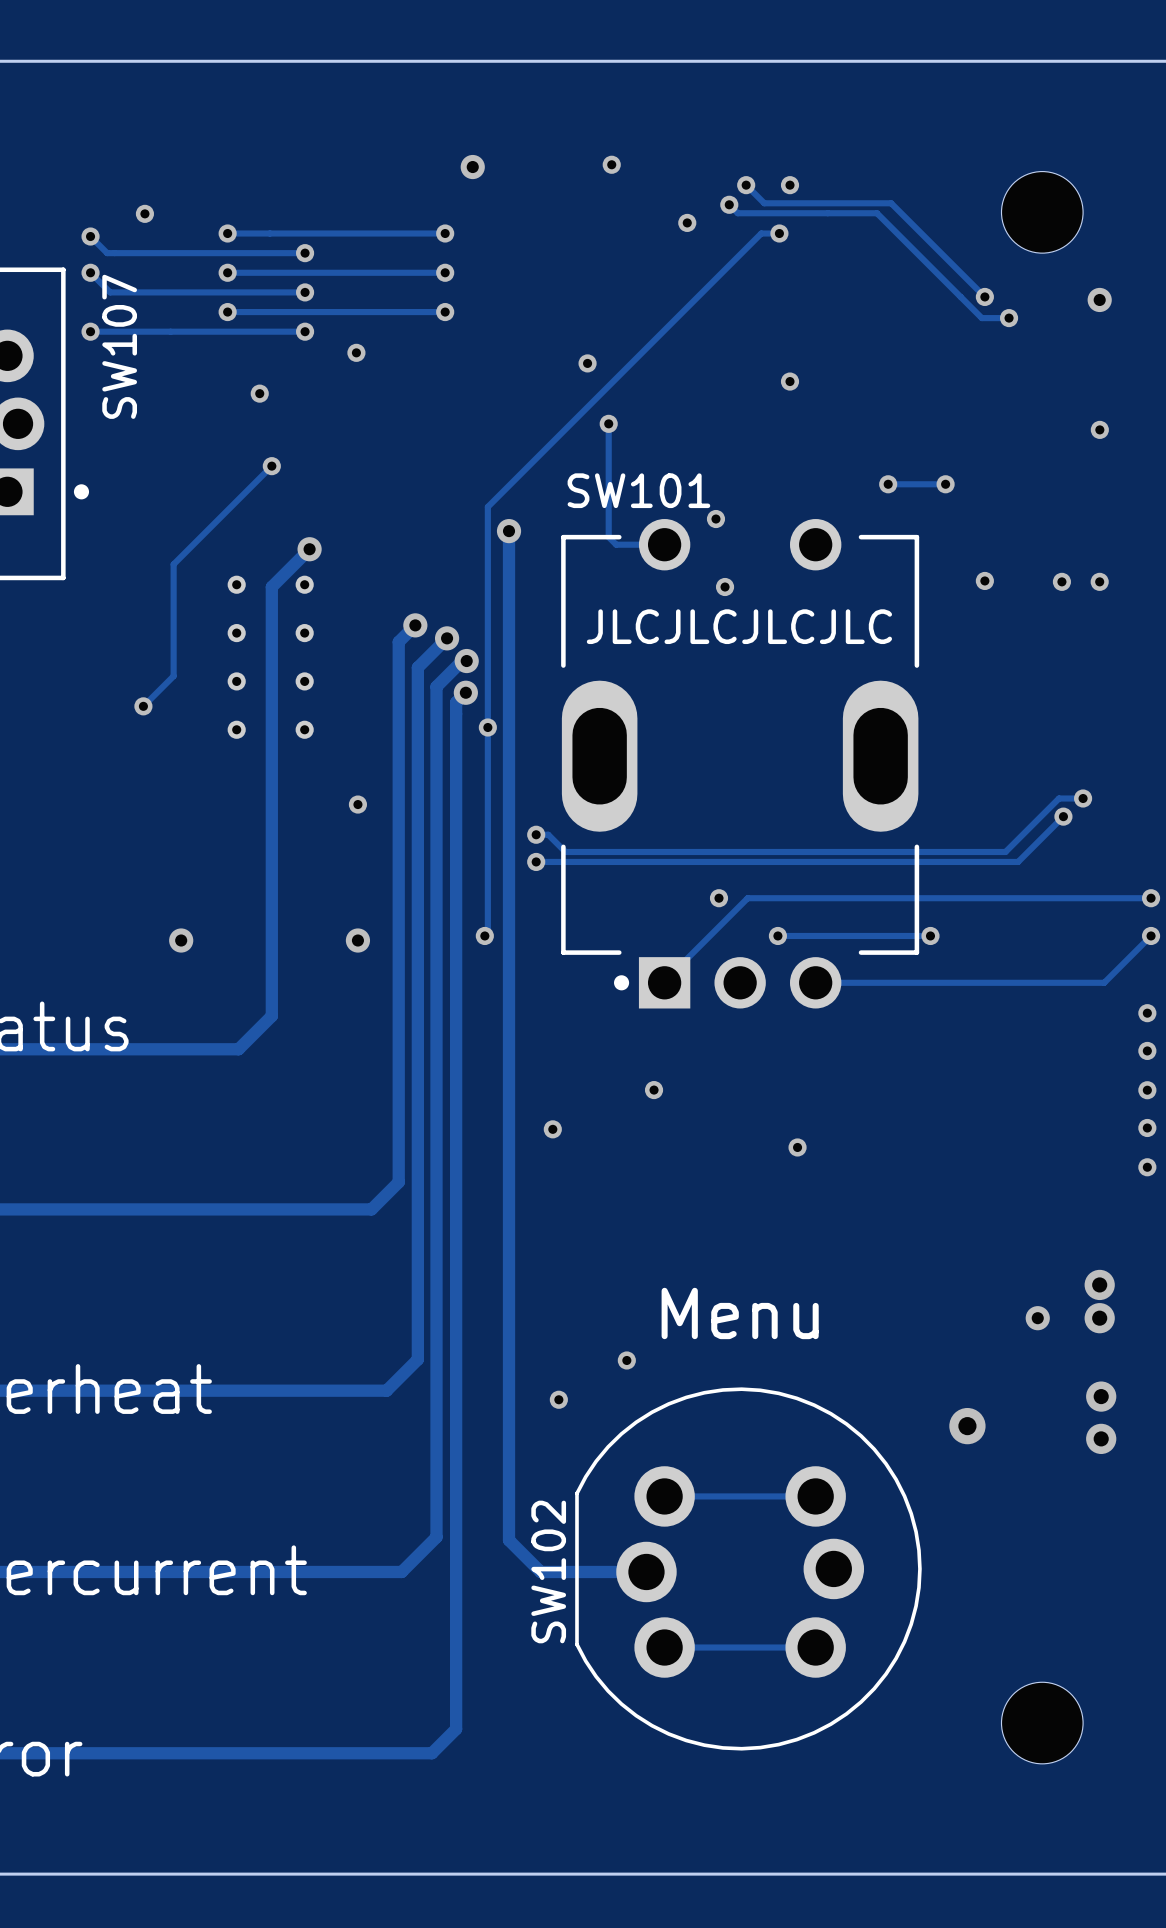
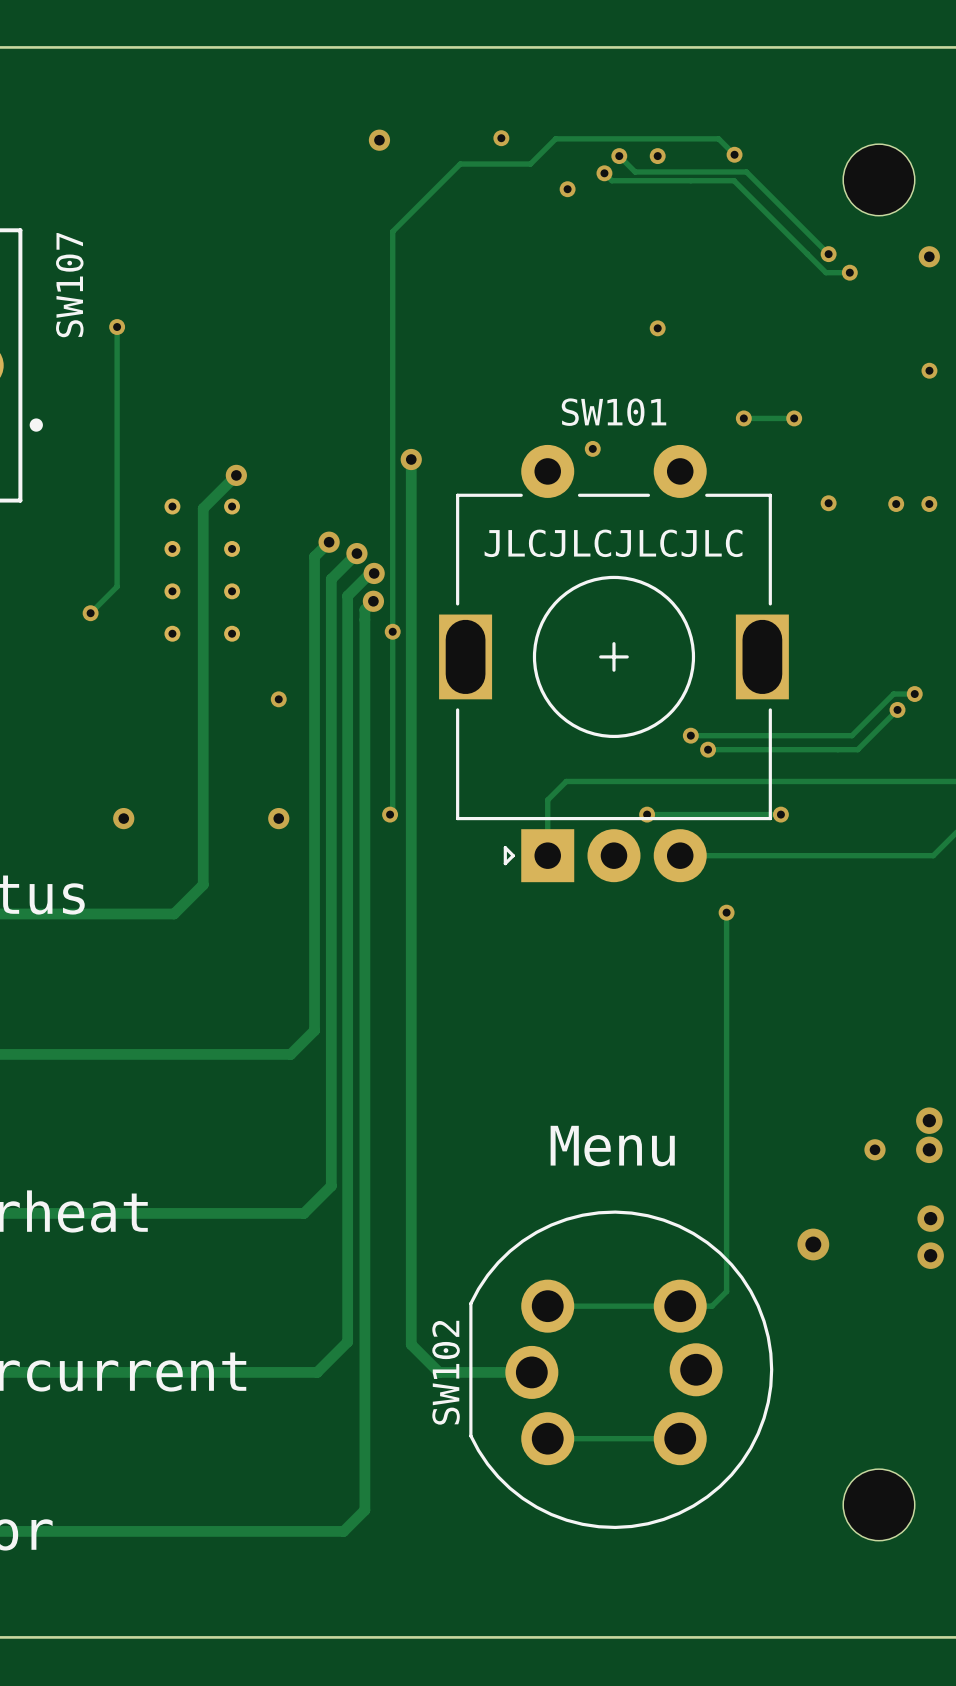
via: (144, 213) -> none
track: (227, 233) (445, 233) -> none
via: (227, 233) -> none
via: (445, 233) -> none
track: (779, 233) (761, 233) (487, 506) -> (734, 154) (718, 138) (555, 138) (530, 164) (460, 164) (392, 231) (392, 438)
via position: (779, 233) -> (734, 154)
track: (90, 236) (107, 253) (305, 253) -> none
via: (90, 236) -> none
via: (305, 253) -> none
track: (90, 272) (110, 292) (305, 292) -> none
via: (90, 272) -> none
track: (227, 272) (445, 272) -> none
via: (227, 272) -> none
via: (445, 272) -> none
via: (305, 292) -> none
track: (227, 312) (445, 312) -> none
via: (227, 312) -> none
via: (445, 312) -> none
track: (90, 331) (305, 331) -> none
via: (90, 331) -> none
via: (305, 331) -> none
via: (356, 352) -> none
via: (587, 363) -> none
via: none -> (117, 327)
via: (259, 393) -> none
track: (608, 423) (608, 537) (616, 544) (664, 544) -> none
via: (608, 423) -> none
track: (271, 466) (173, 564) -> (117, 327) (117, 488)
via: (271, 466) -> none
SW101 name position: SW101 (638, 490) -> SW101 (613, 412)
SW101 footprint: [561, 519, 920, 1009] -> [439, 444, 789, 883]
via: (725, 587) -> none
track: (536, 834) (548, 834) (565, 851) (1005, 851) (1011, 845) -> (690, 735) (851, 735)
via: (536, 834) -> none
via: none -> (690, 735)
track: (536, 861) (847, 861) -> none
via: (536, 861) -> none
via: none -> (708, 749)
via: (719, 898) -> none
track: (747, 898) (664, 981) -> (620, 781) (566, 781) (547, 800) (547, 854)
track: none -> (726, 912) (726, 1291) (712, 1306) (682, 1306)
via: none -> (726, 912)
via: (654, 1090) -> none
via: (552, 1129) -> none
via: (797, 1147) -> none
via: (626, 1360) -> none
via: (558, 1399) -> none

